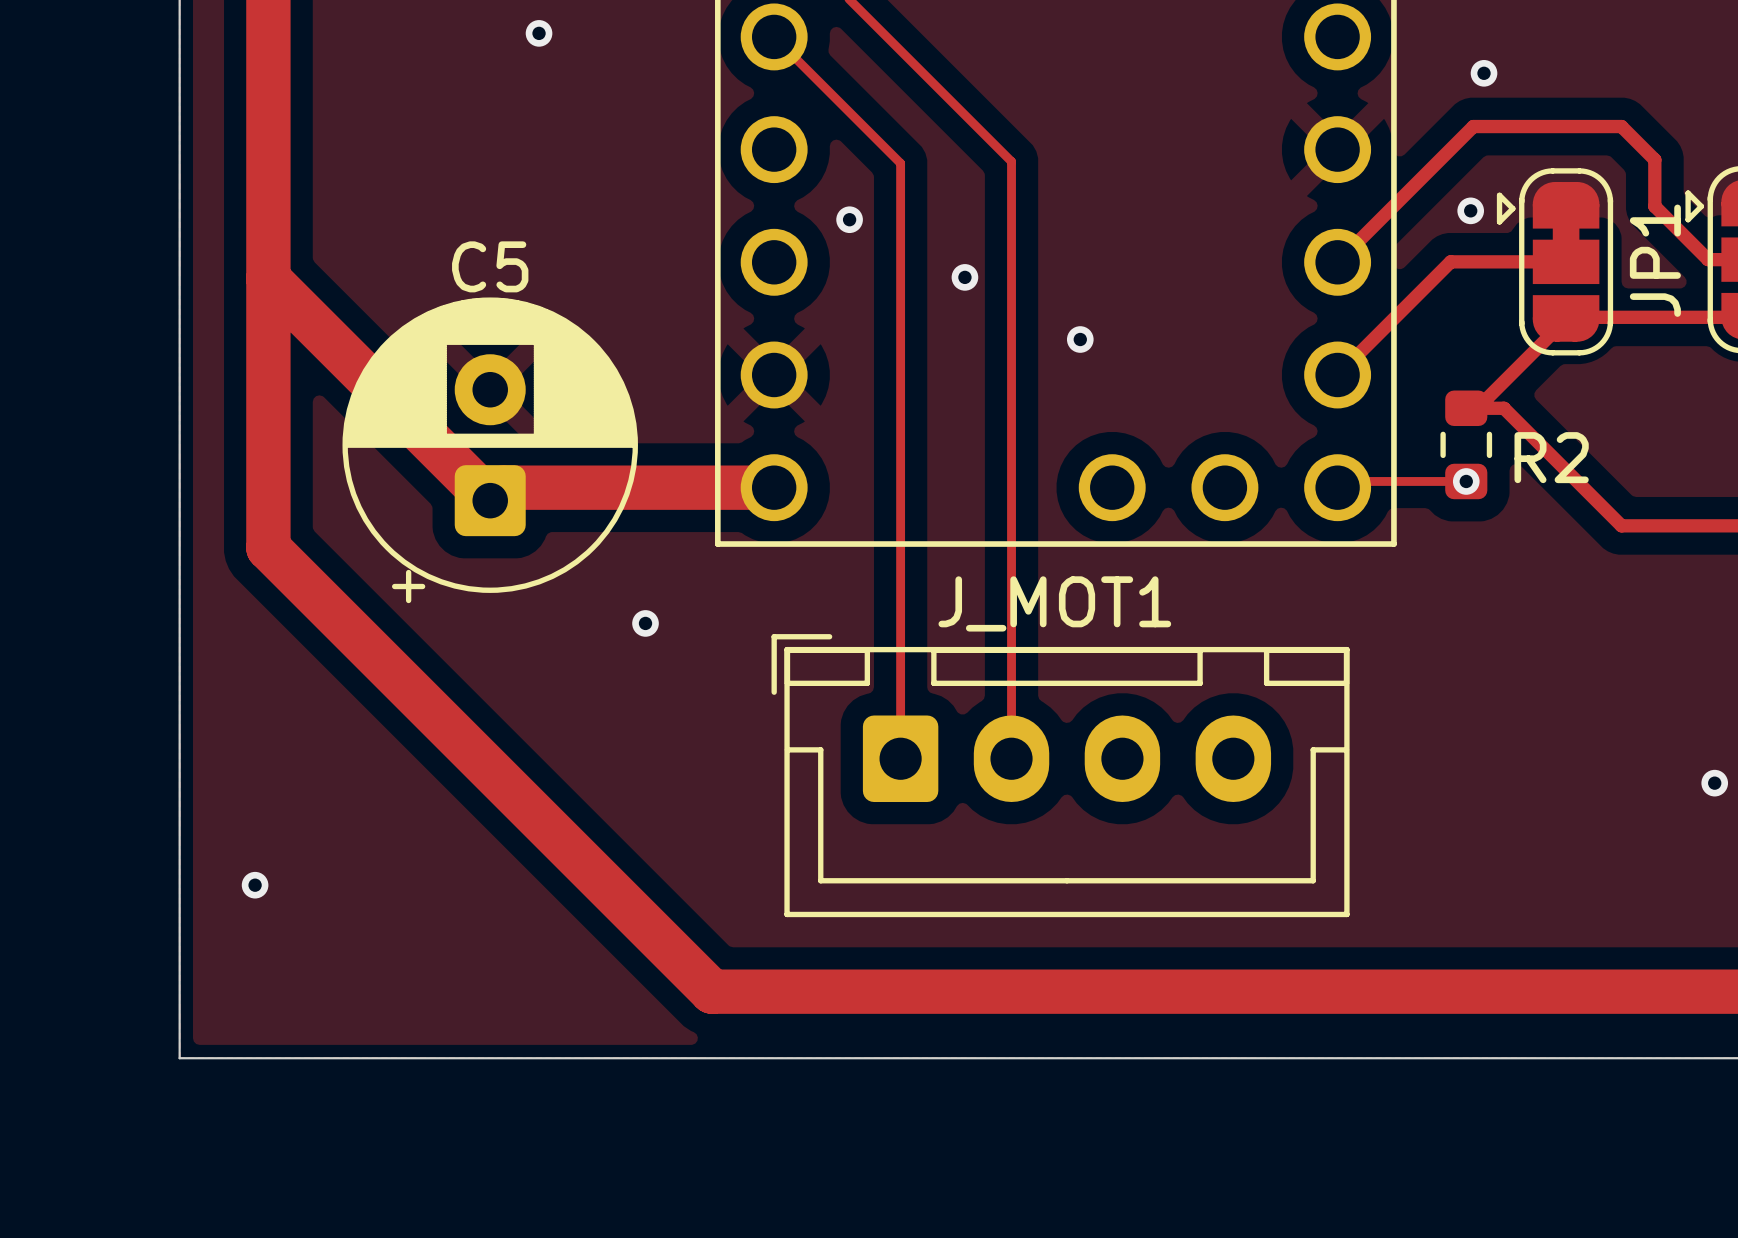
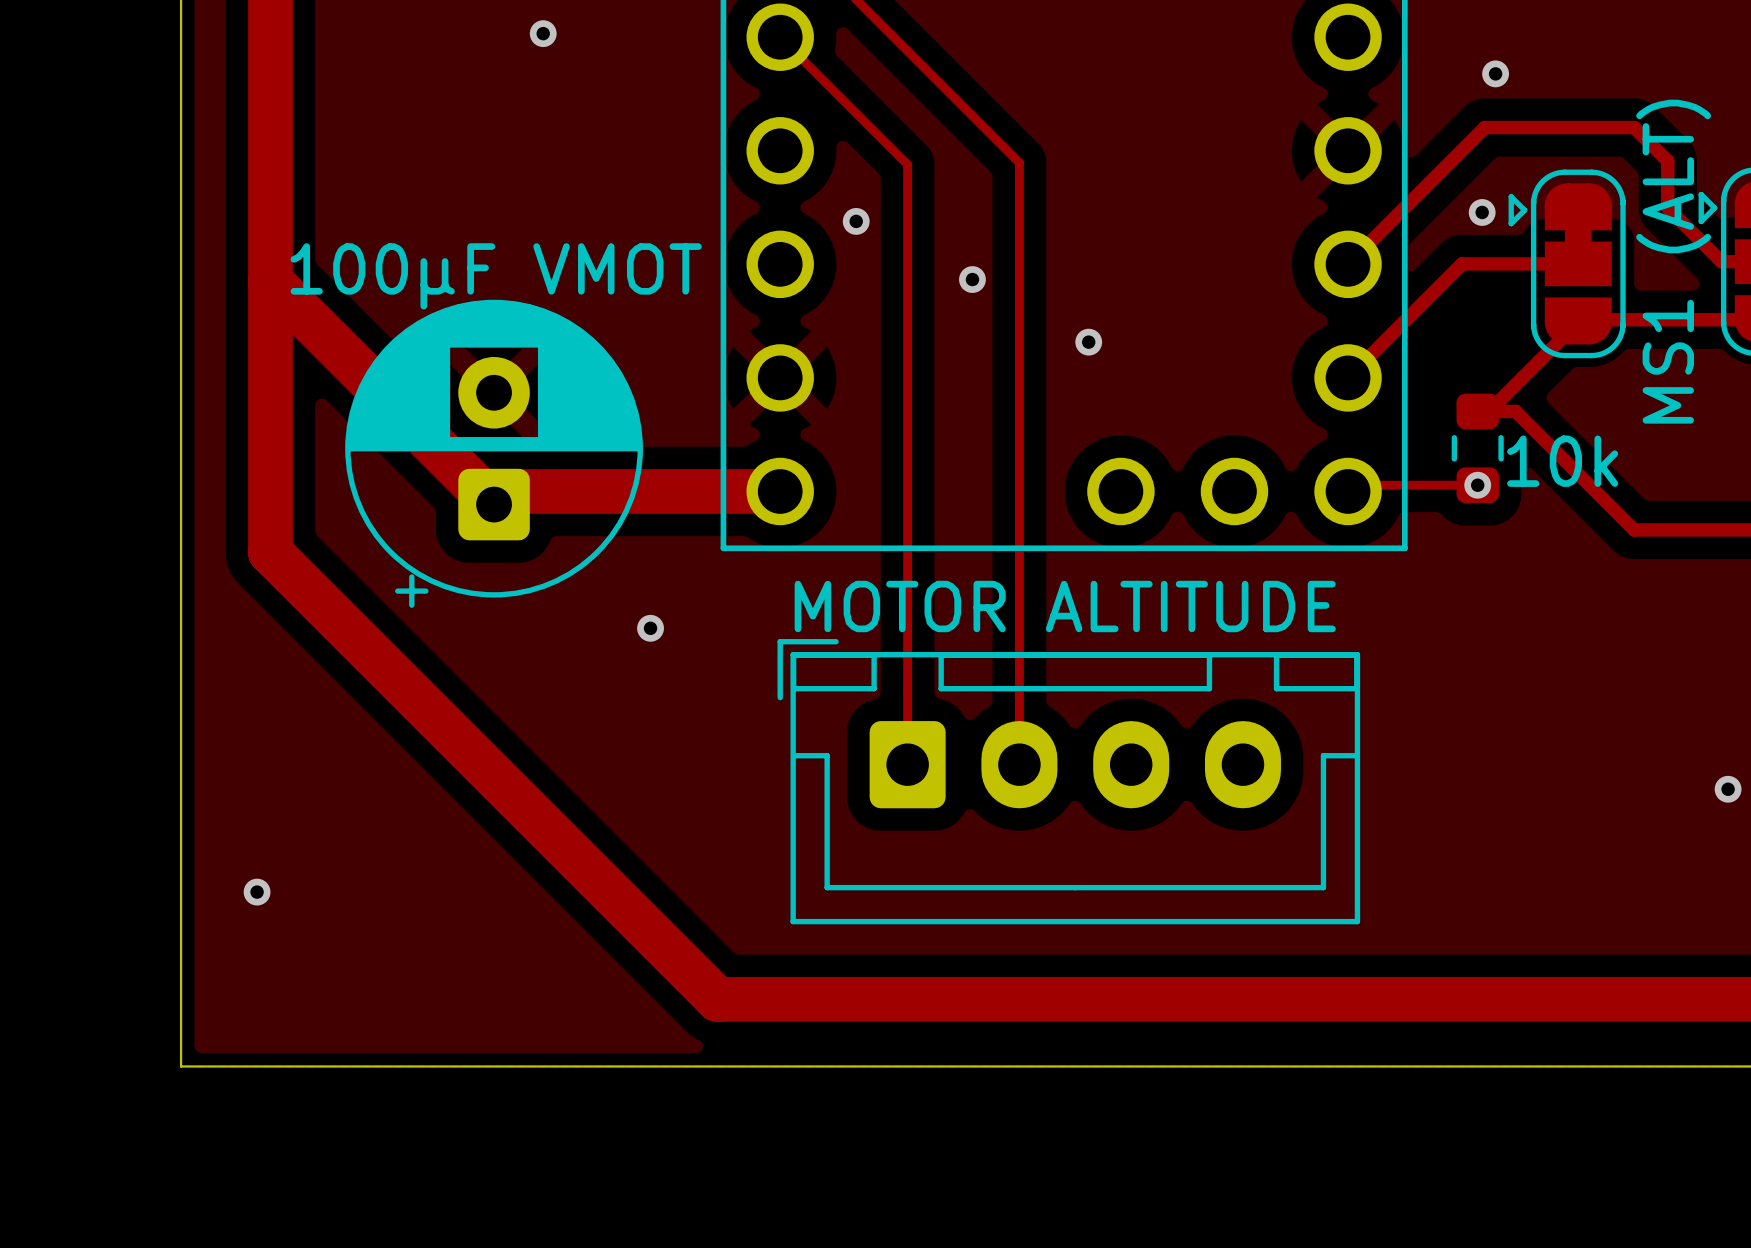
JP1 name: JP1 (1655, 260) -> MS1 (ALT) (1673, 261)
C5 name: C5 (490, 266) -> 100µF VMOT (496, 276)
R2 name: R2 (1551, 457) -> 10k (1562, 461)
J_MOT1 name: J_MOT1 (1054, 603) -> MOTOR ALTITUDE (1065, 606)

